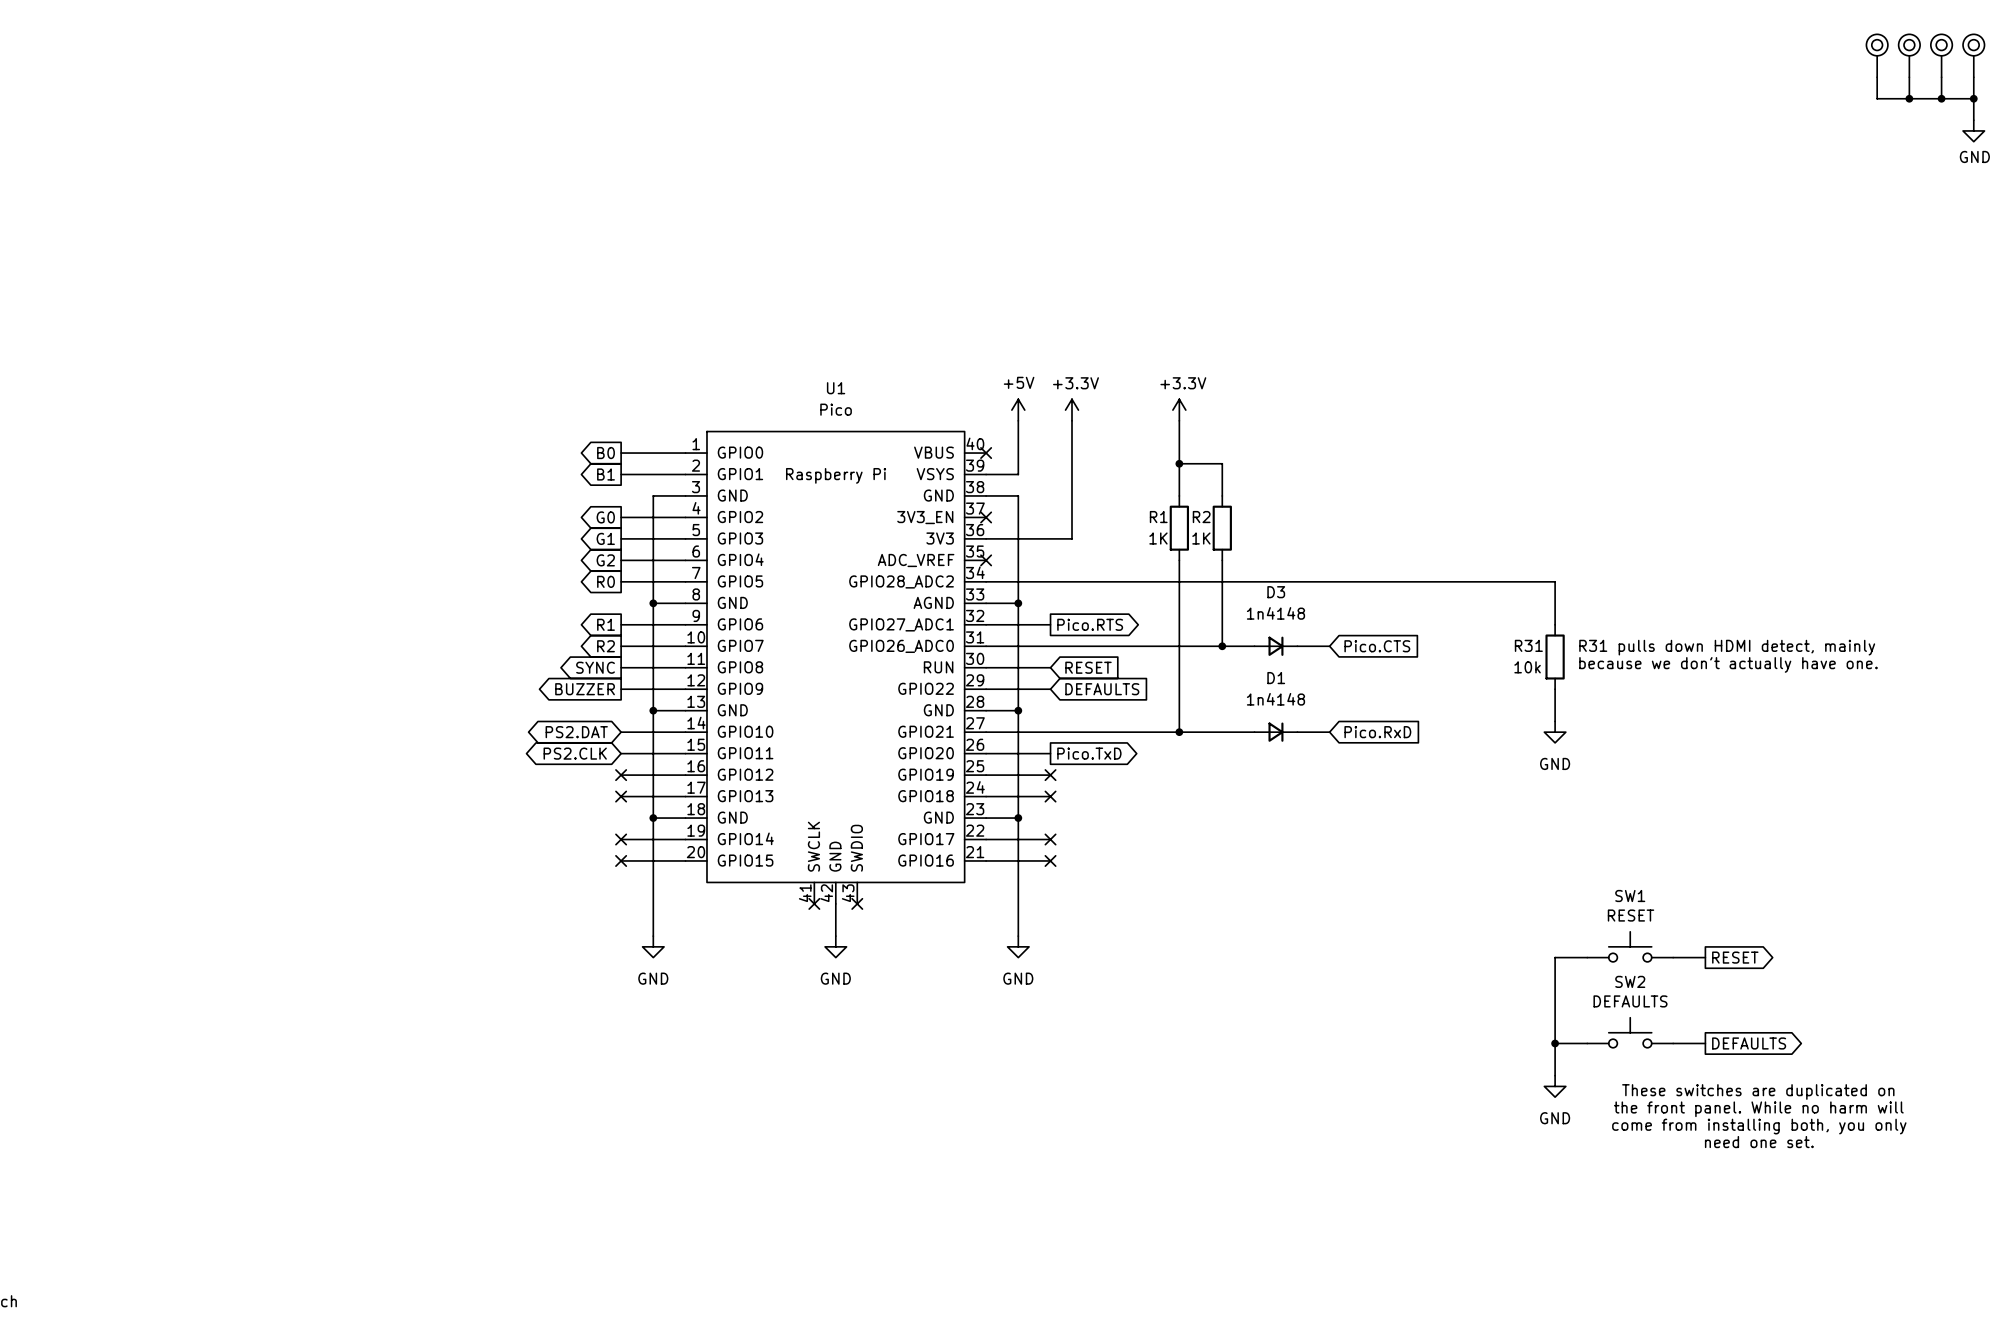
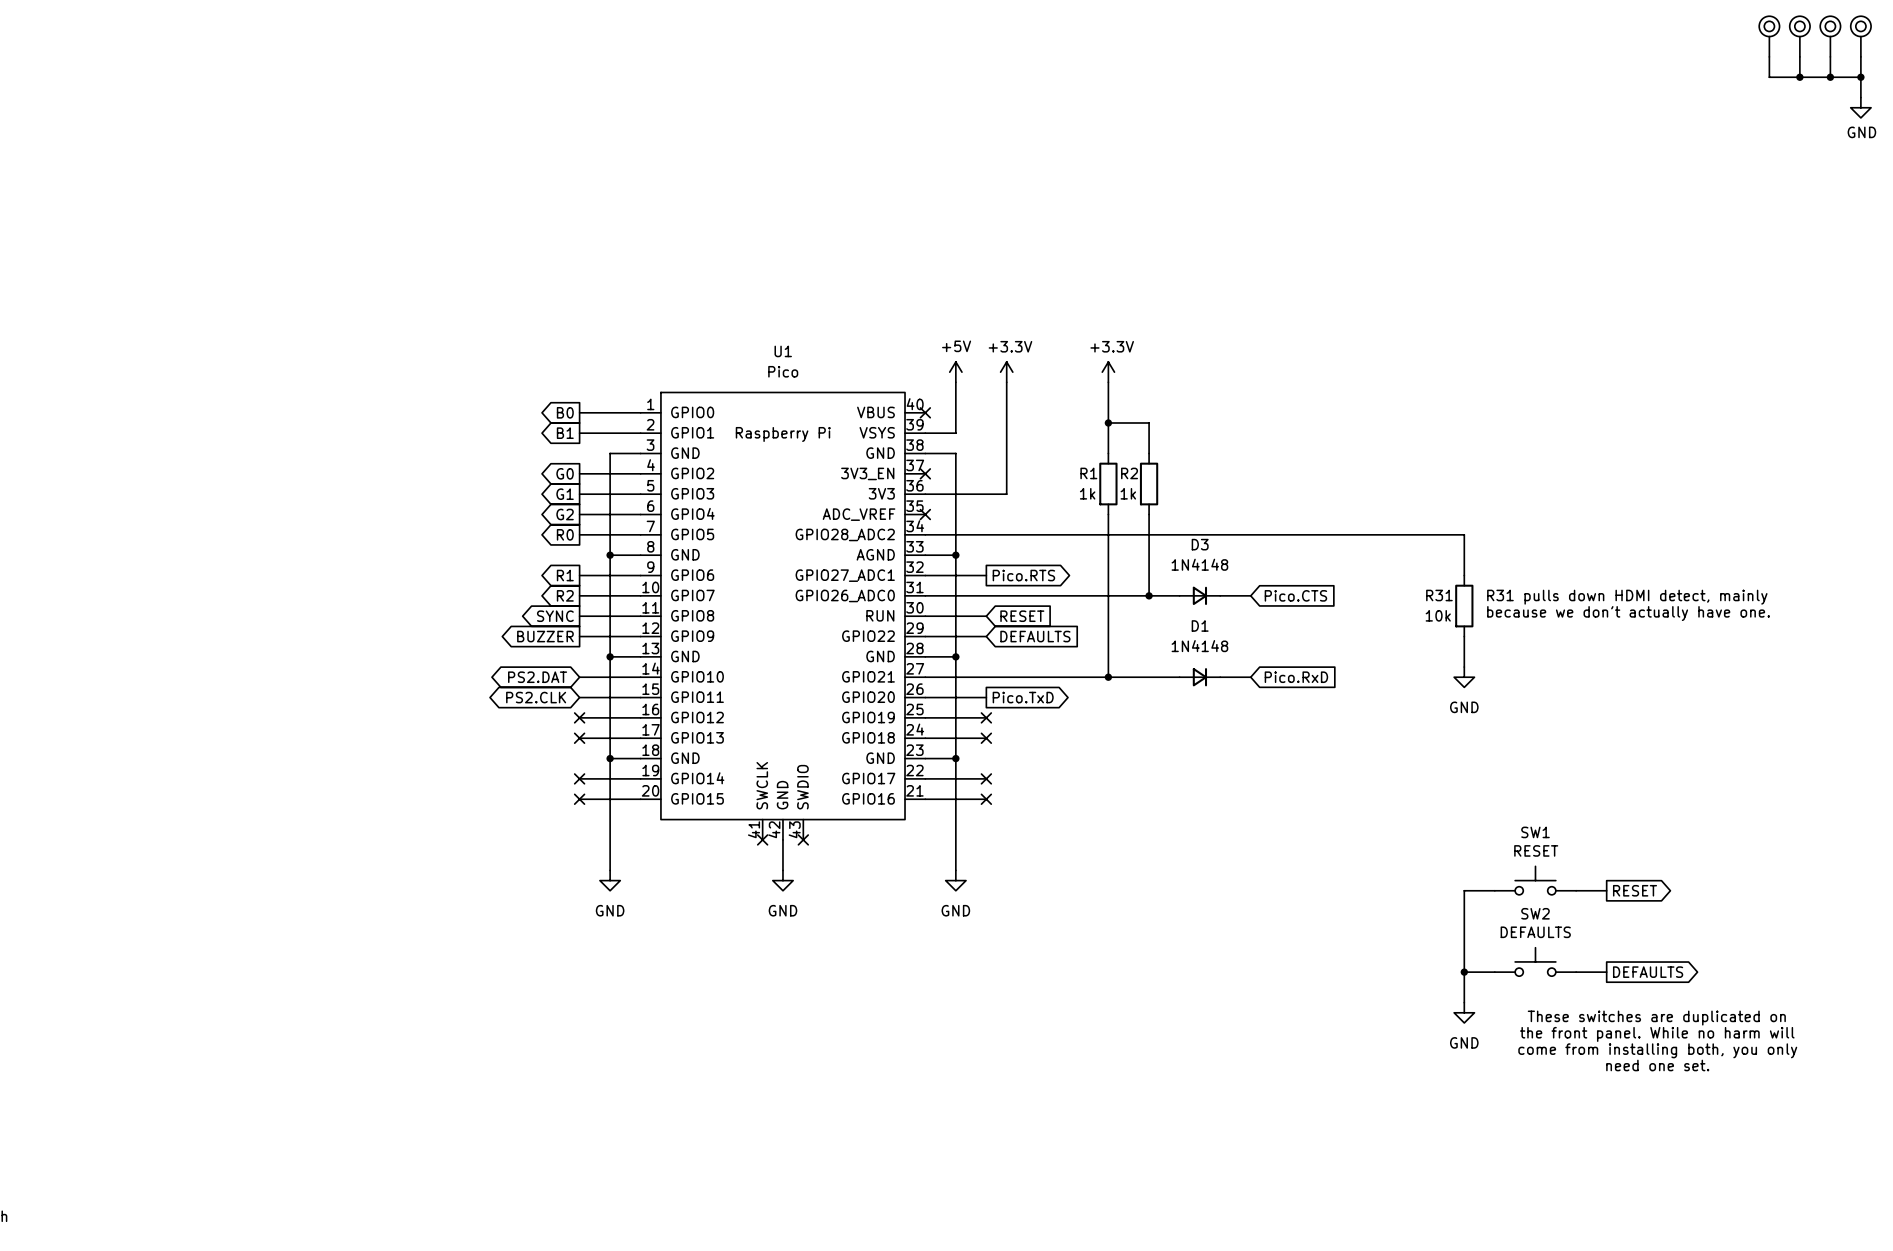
R1 value: 1K (1158, 538) -> 1k (1087, 493)
R2 value: 1K (1201, 538) -> 1k (1128, 493)
D3 value: 1n4148 (1275, 613) -> 1N4148 (1199, 564)
D1 value: 1n4148 (1275, 699) -> 1N4148 (1199, 646)

